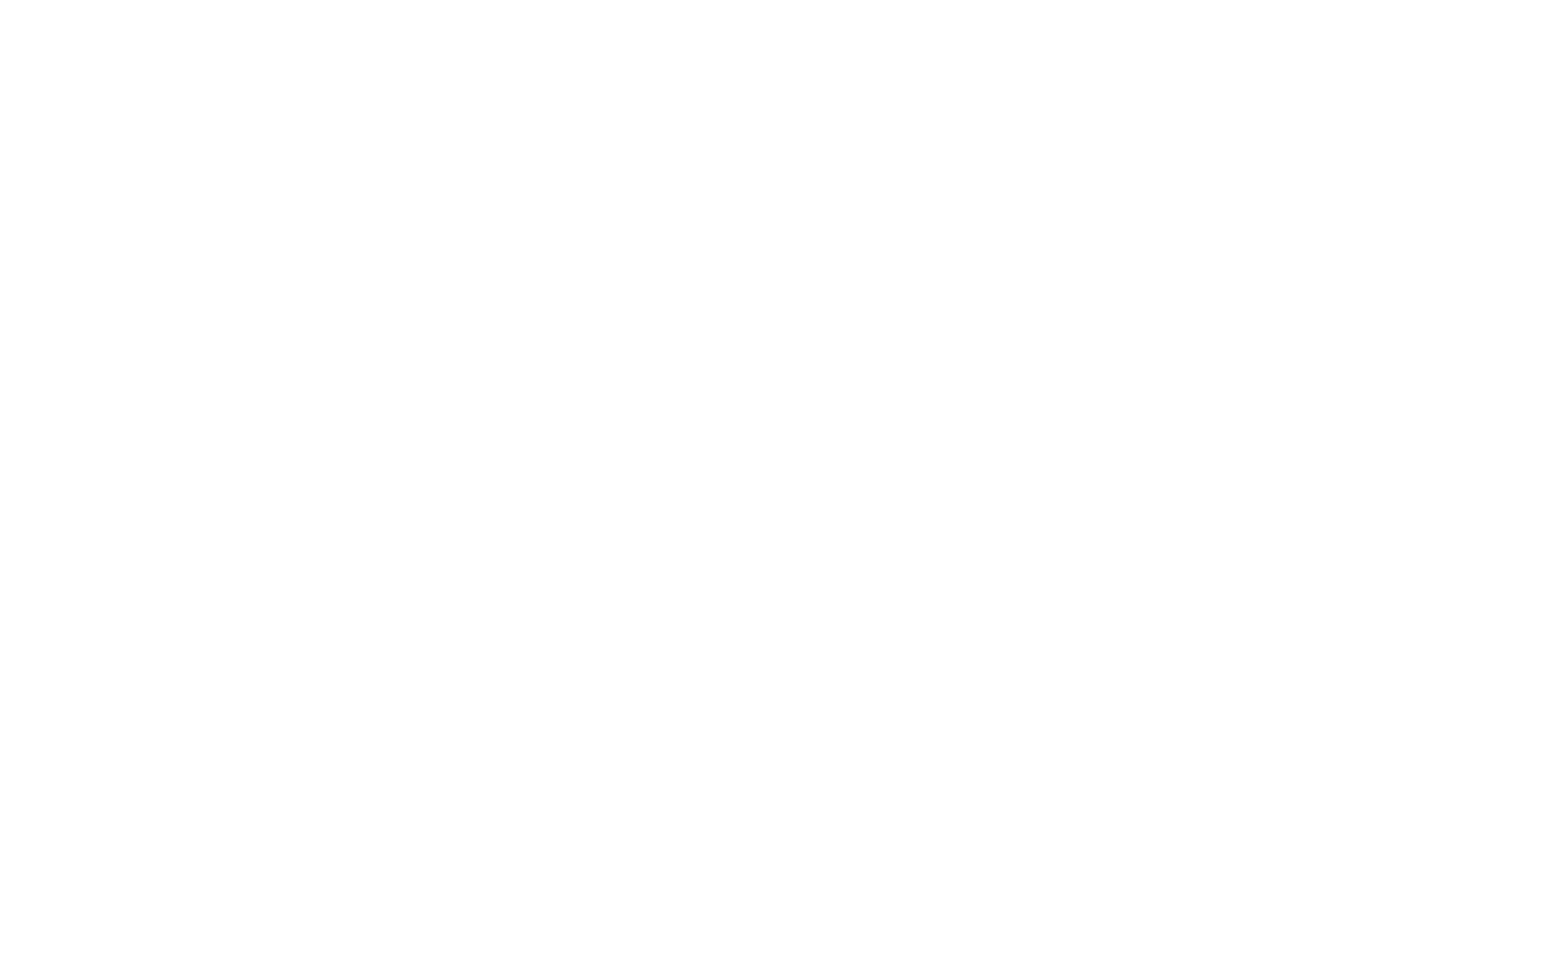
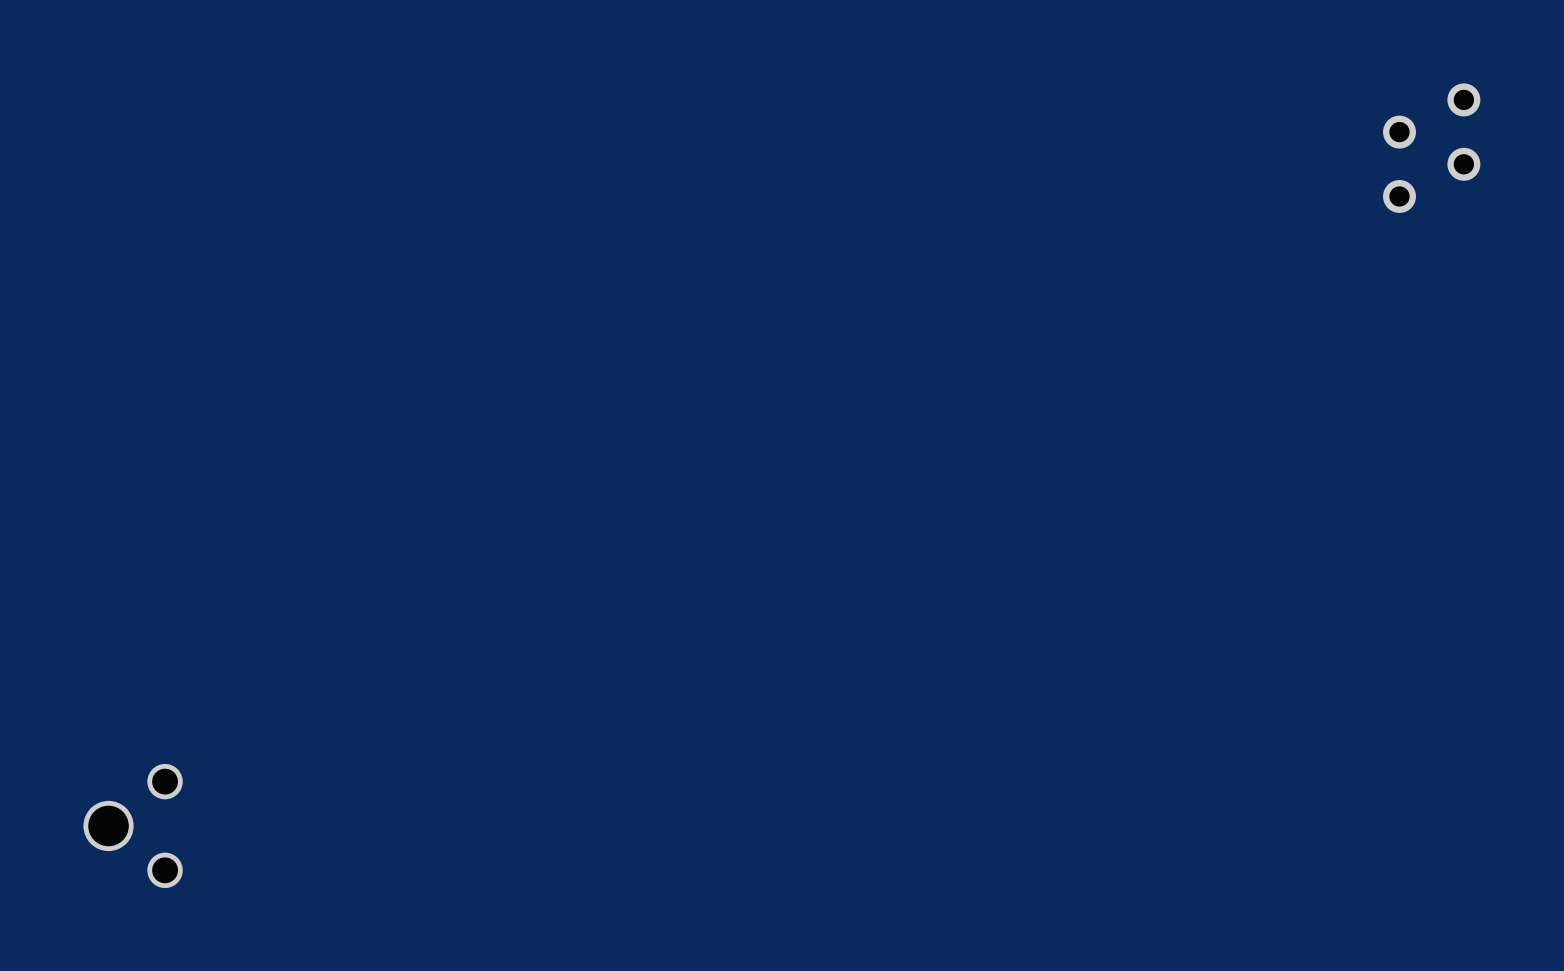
part: none -> (1431, 148)
part: none -> (133, 825)

